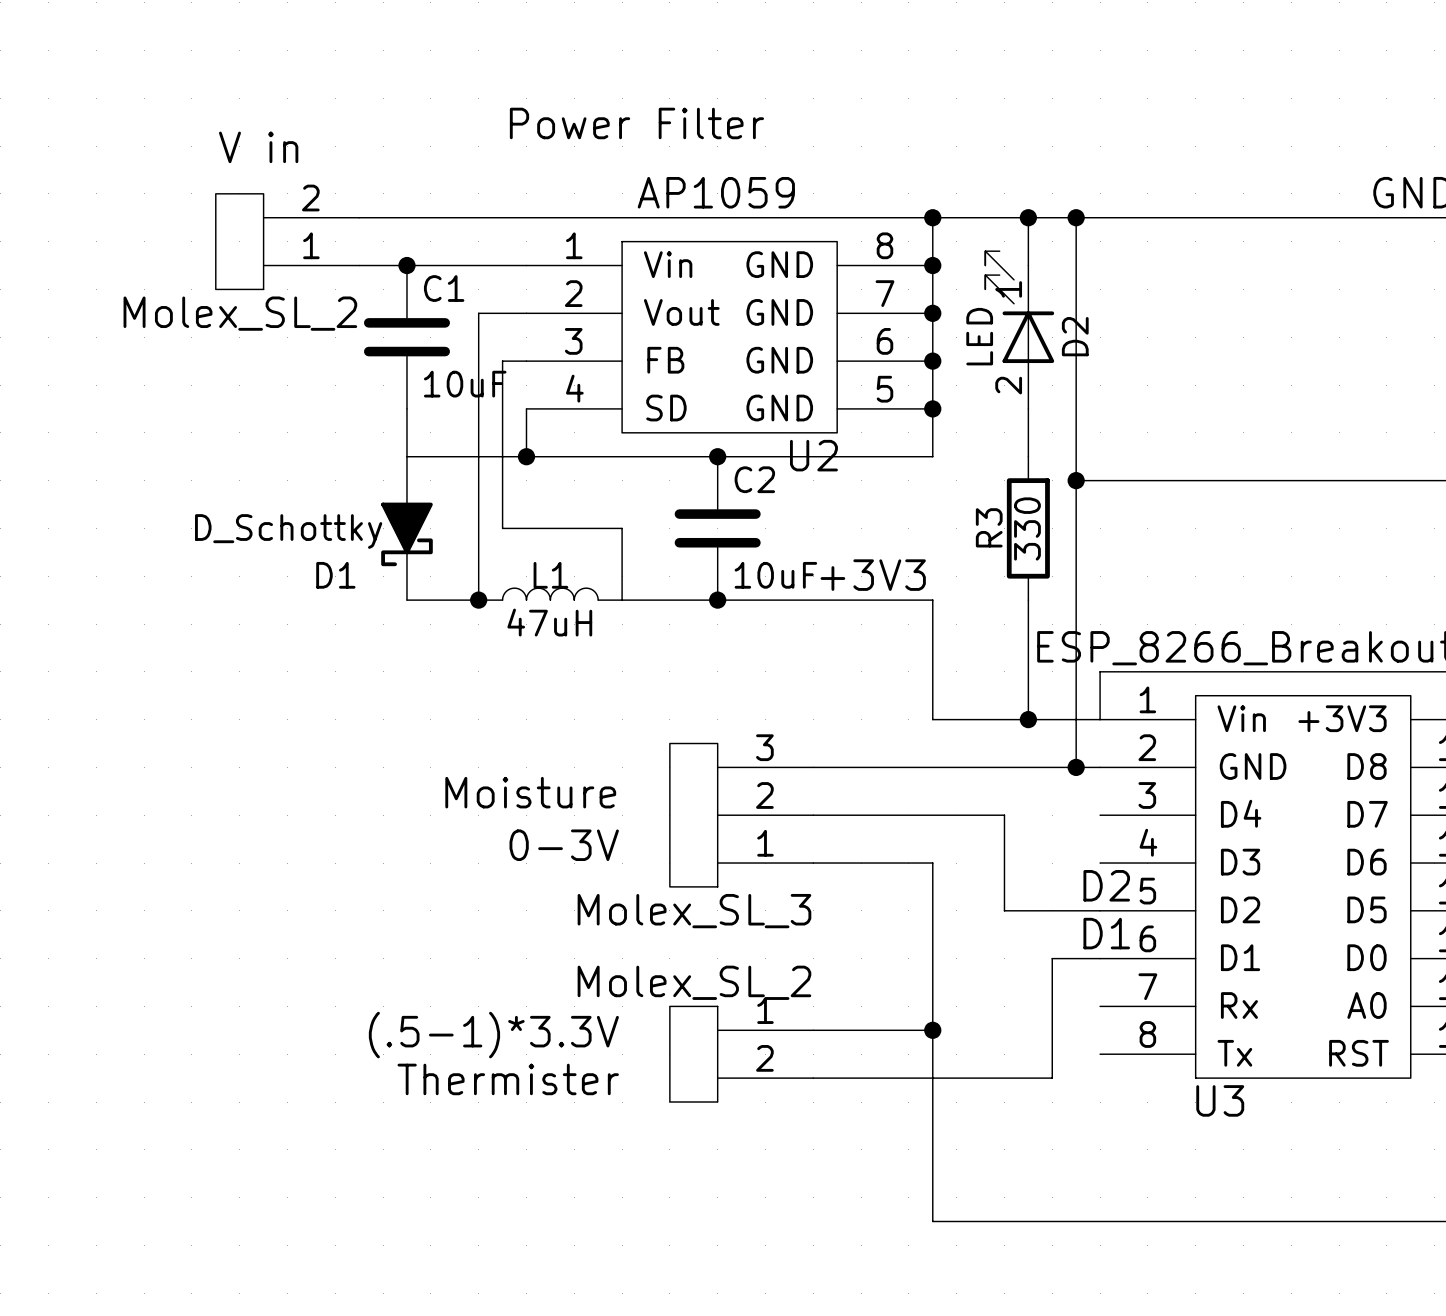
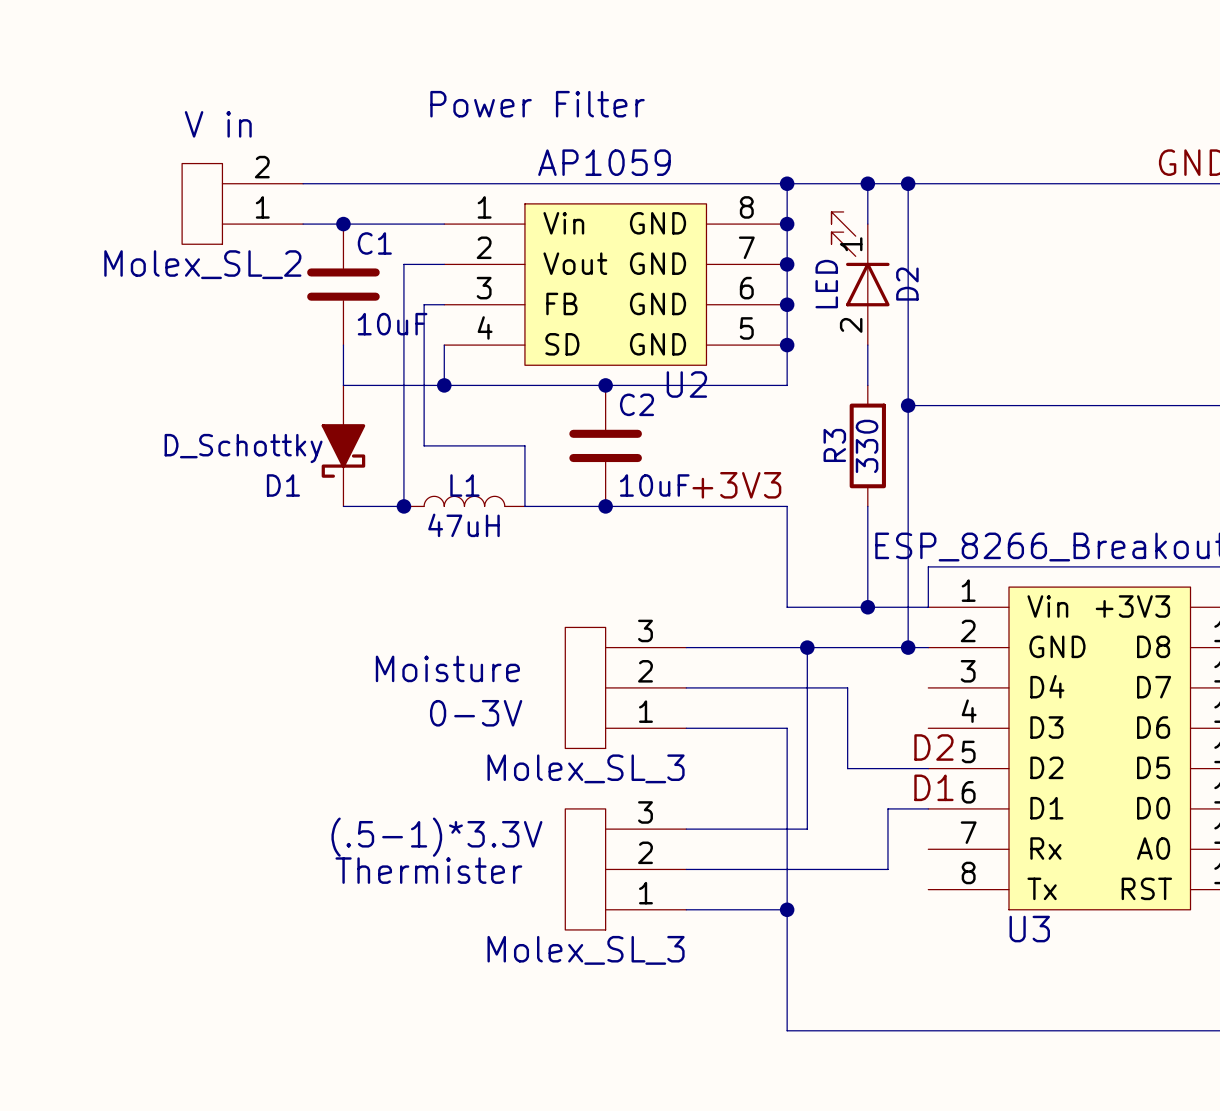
wire: none -> (807, 647) (807, 829) (686, 829)
junction: none -> (807, 647)
text: none -> (.5-1)*3.3V (436, 837)
part: none -> Molex_SL_3 (625, 869)
junction position: (932, 1030) -> (787, 909)
wire: (1052, 1030) (1052, 1078) (932, 1078) -> (887, 869) (787, 869)
text: (.5-1)*3.3V (493, 1035) -> Thermister (428, 870)
part: Molex_SL_2 (741, 1054) -> none
text: Thermister (508, 1079) -> none

